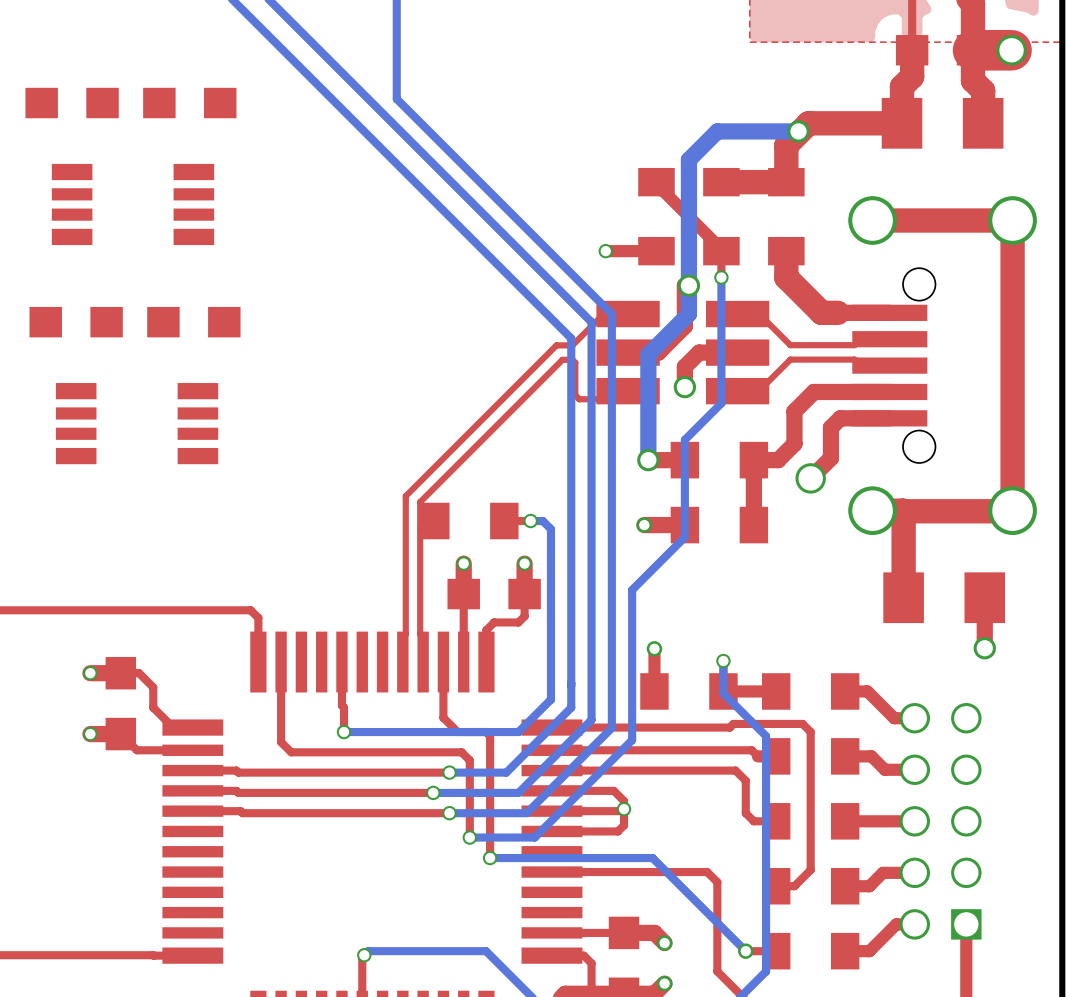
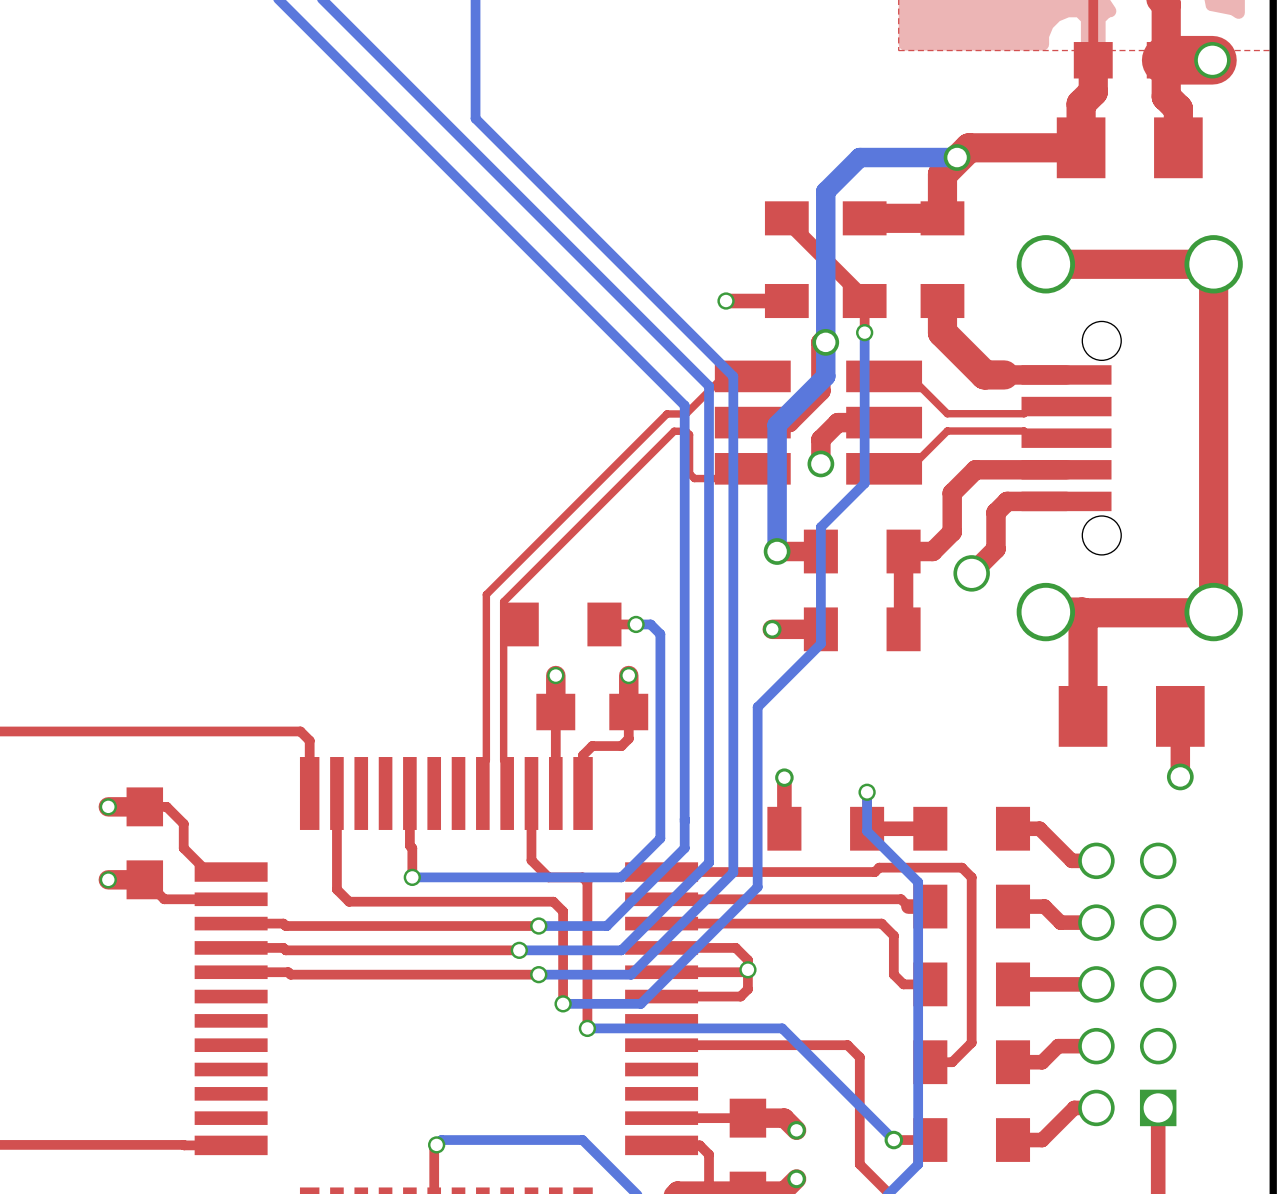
part: (72, 103) -> none
part: (189, 103) -> none
part: (132, 204) -> none
part: (76, 322) -> none
part: (193, 322) -> none
part: (137, 423) -> none

